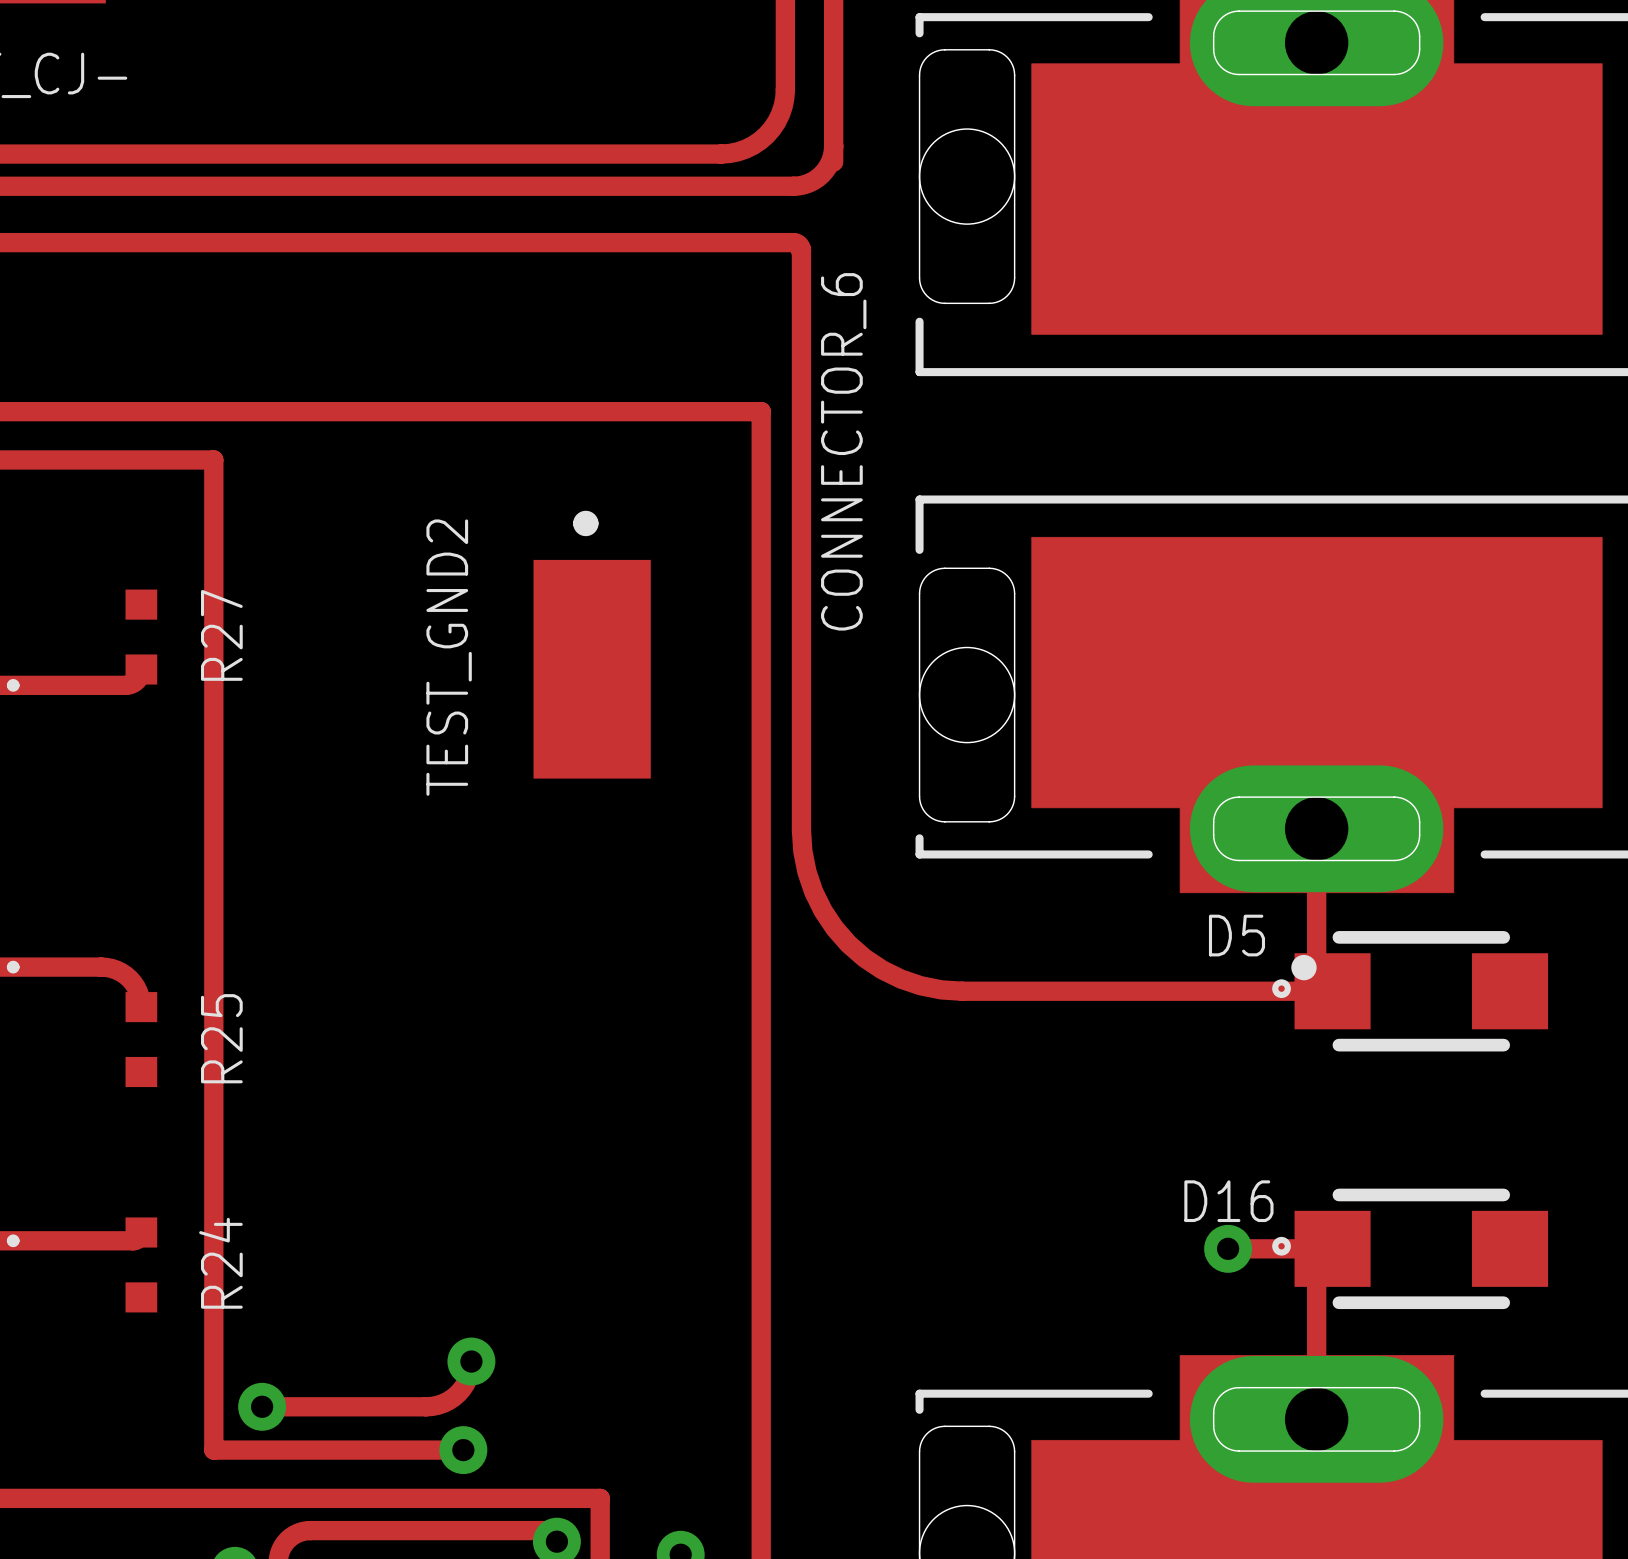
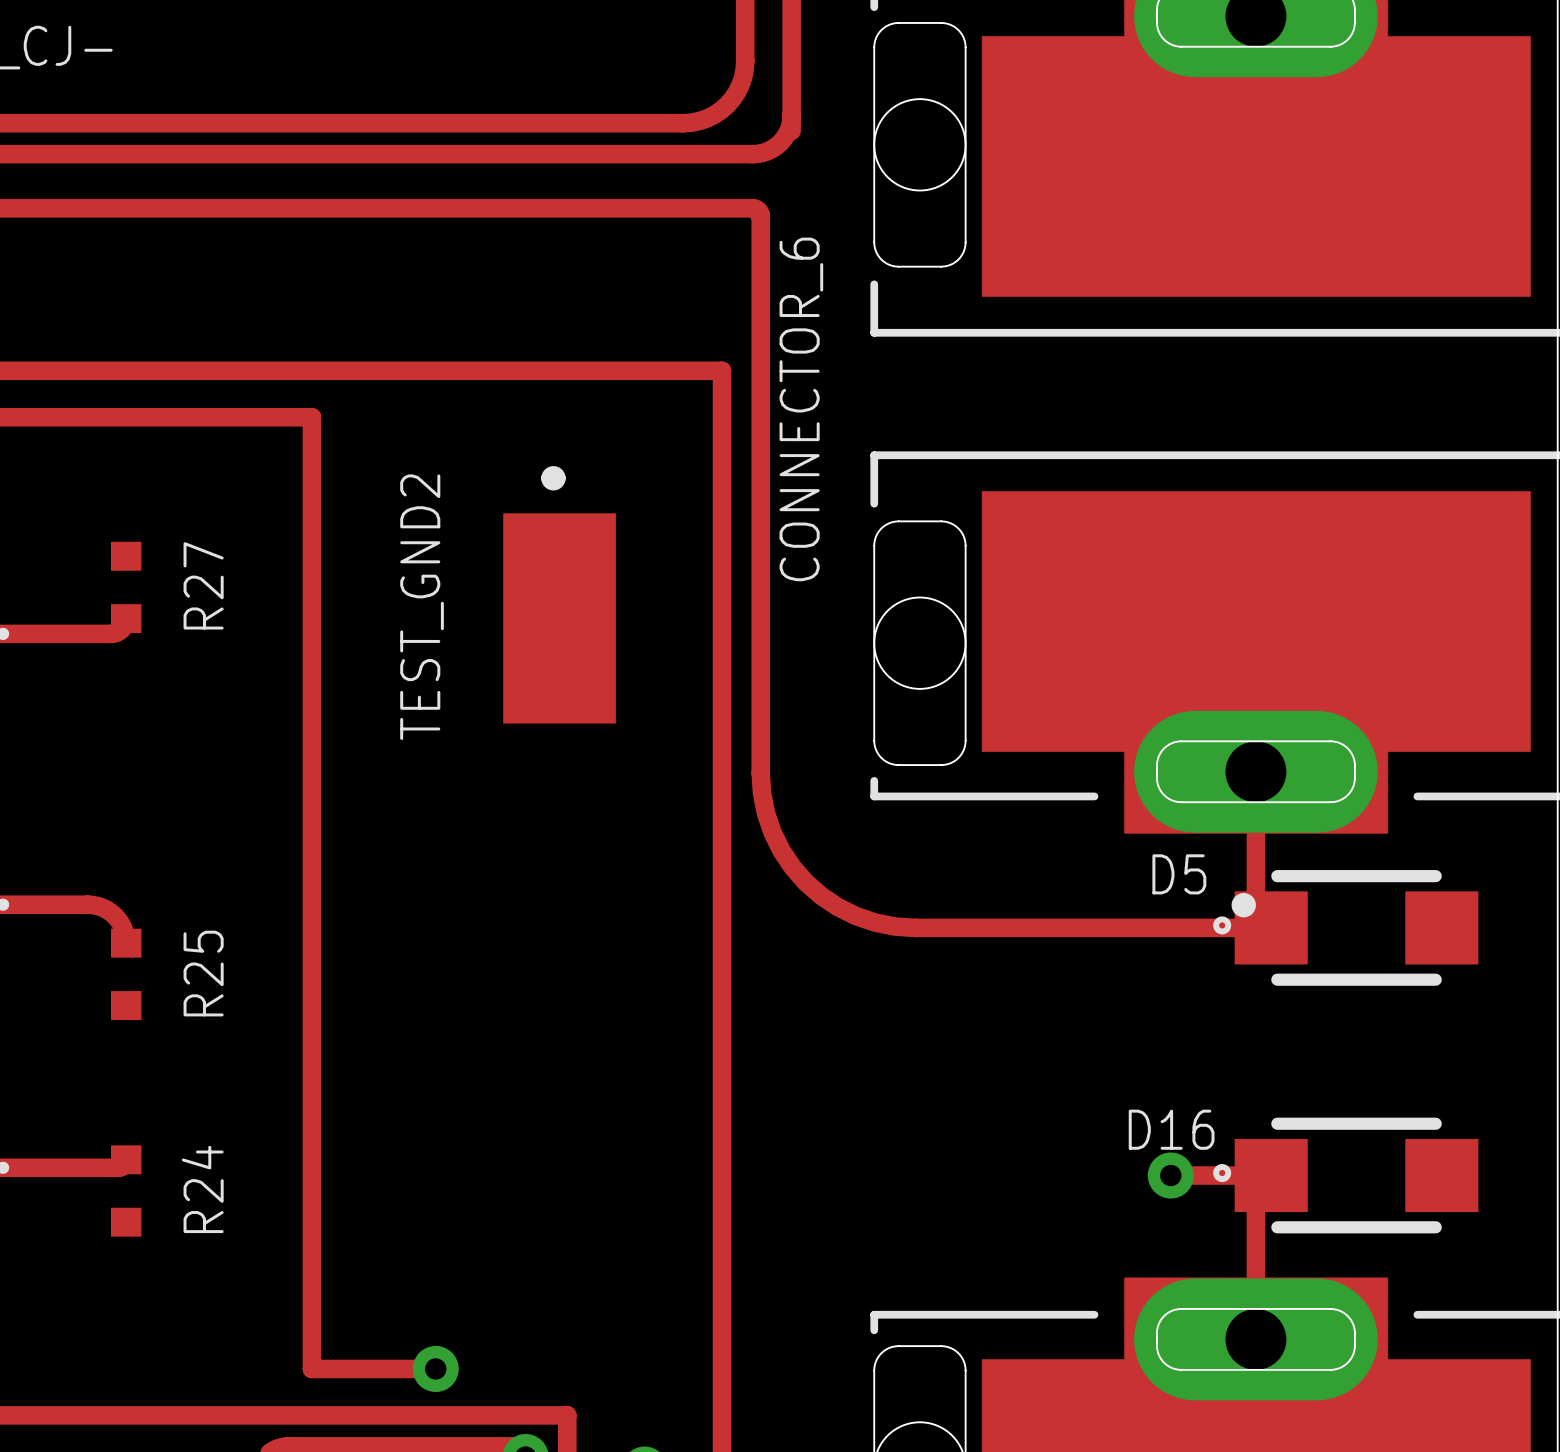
track: (213, 459) (213, 1450) (334, 1450) -> (195, 417) (311, 417) (311, 1368)
track: (471, 1361) (469, 1373) (462, 1389) (453, 1397) (437, 1405) (262, 1406) -> none
via: (471, 1361) -> none
via: (262, 1406) -> none

